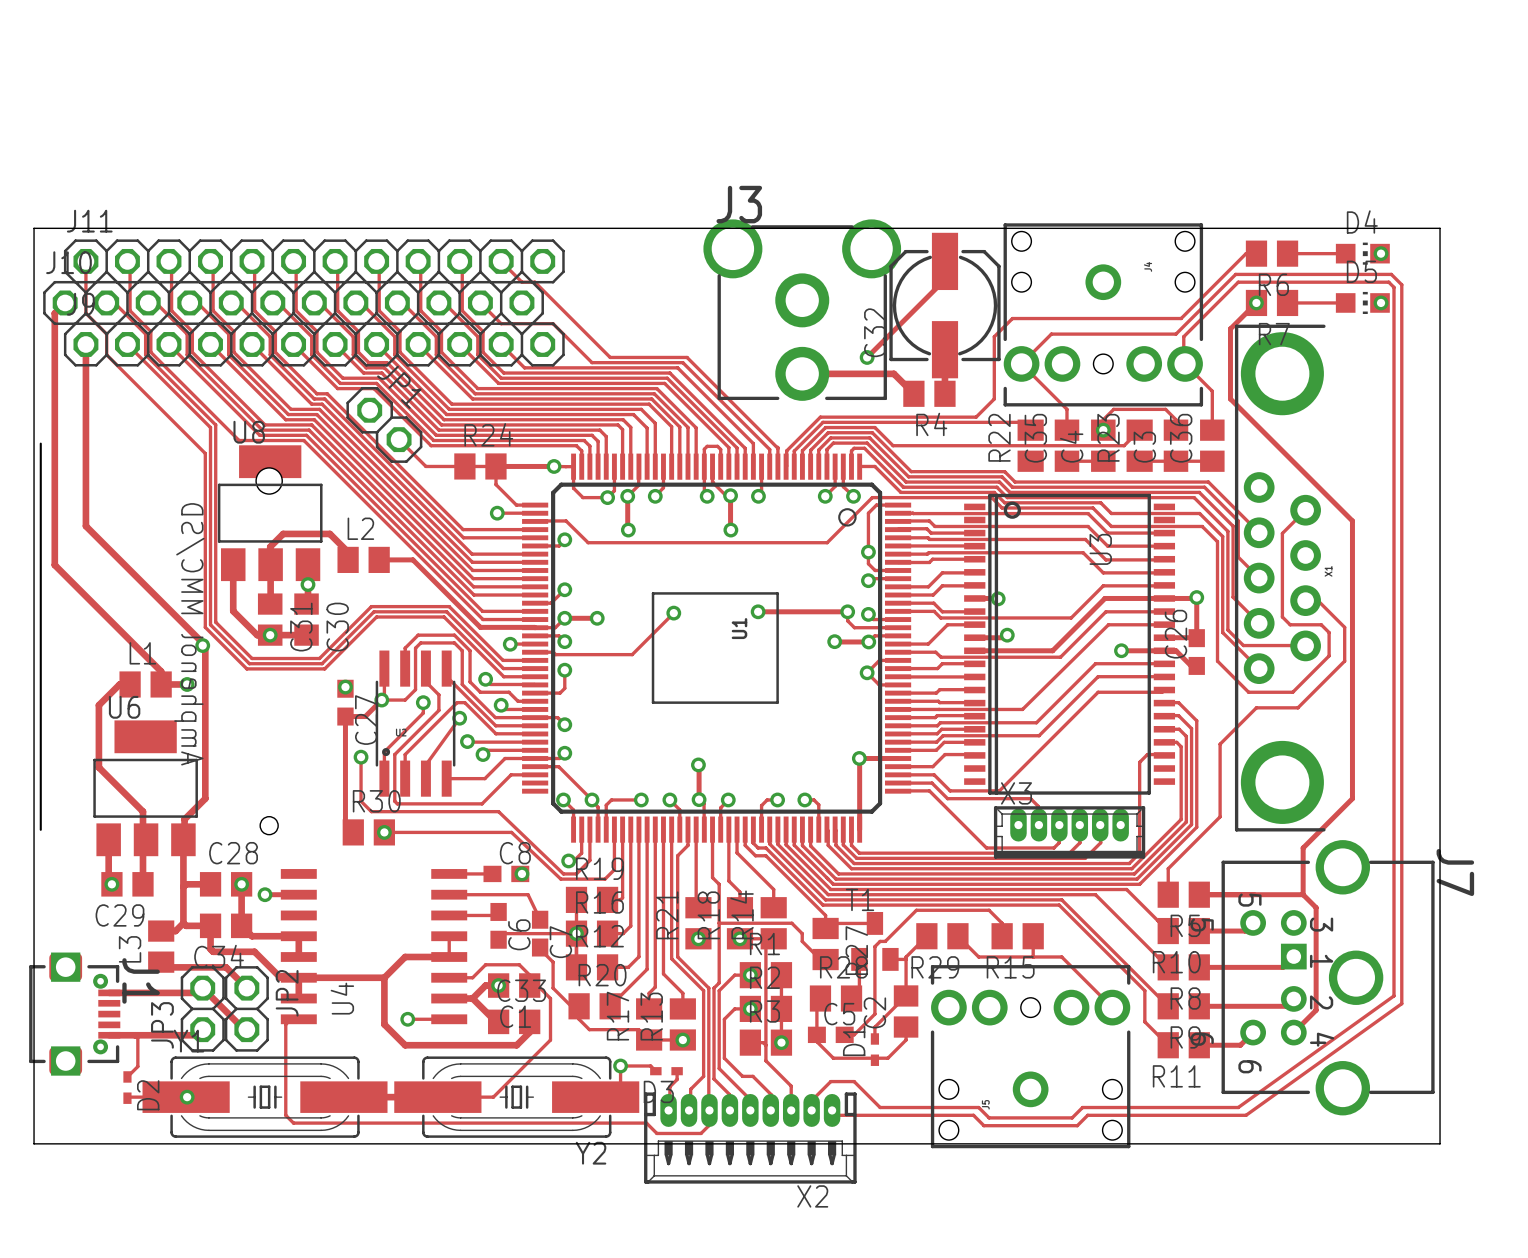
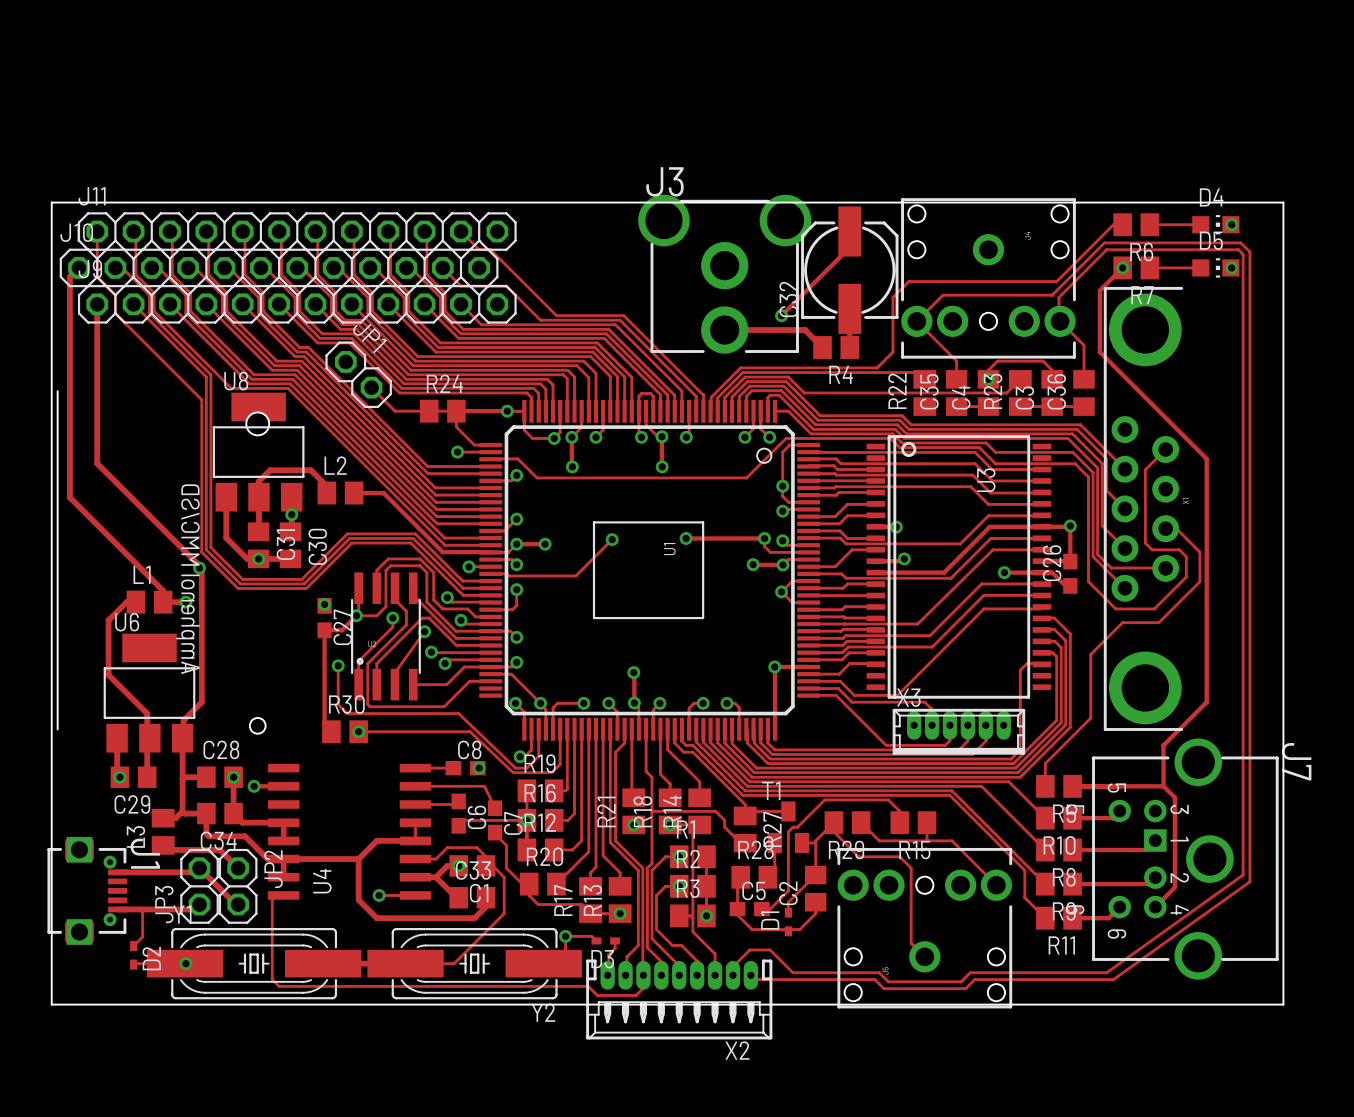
track: none -> (833, 822) (833, 831) (858, 856) (899, 856) (911, 868) (911, 943) (924, 956)

